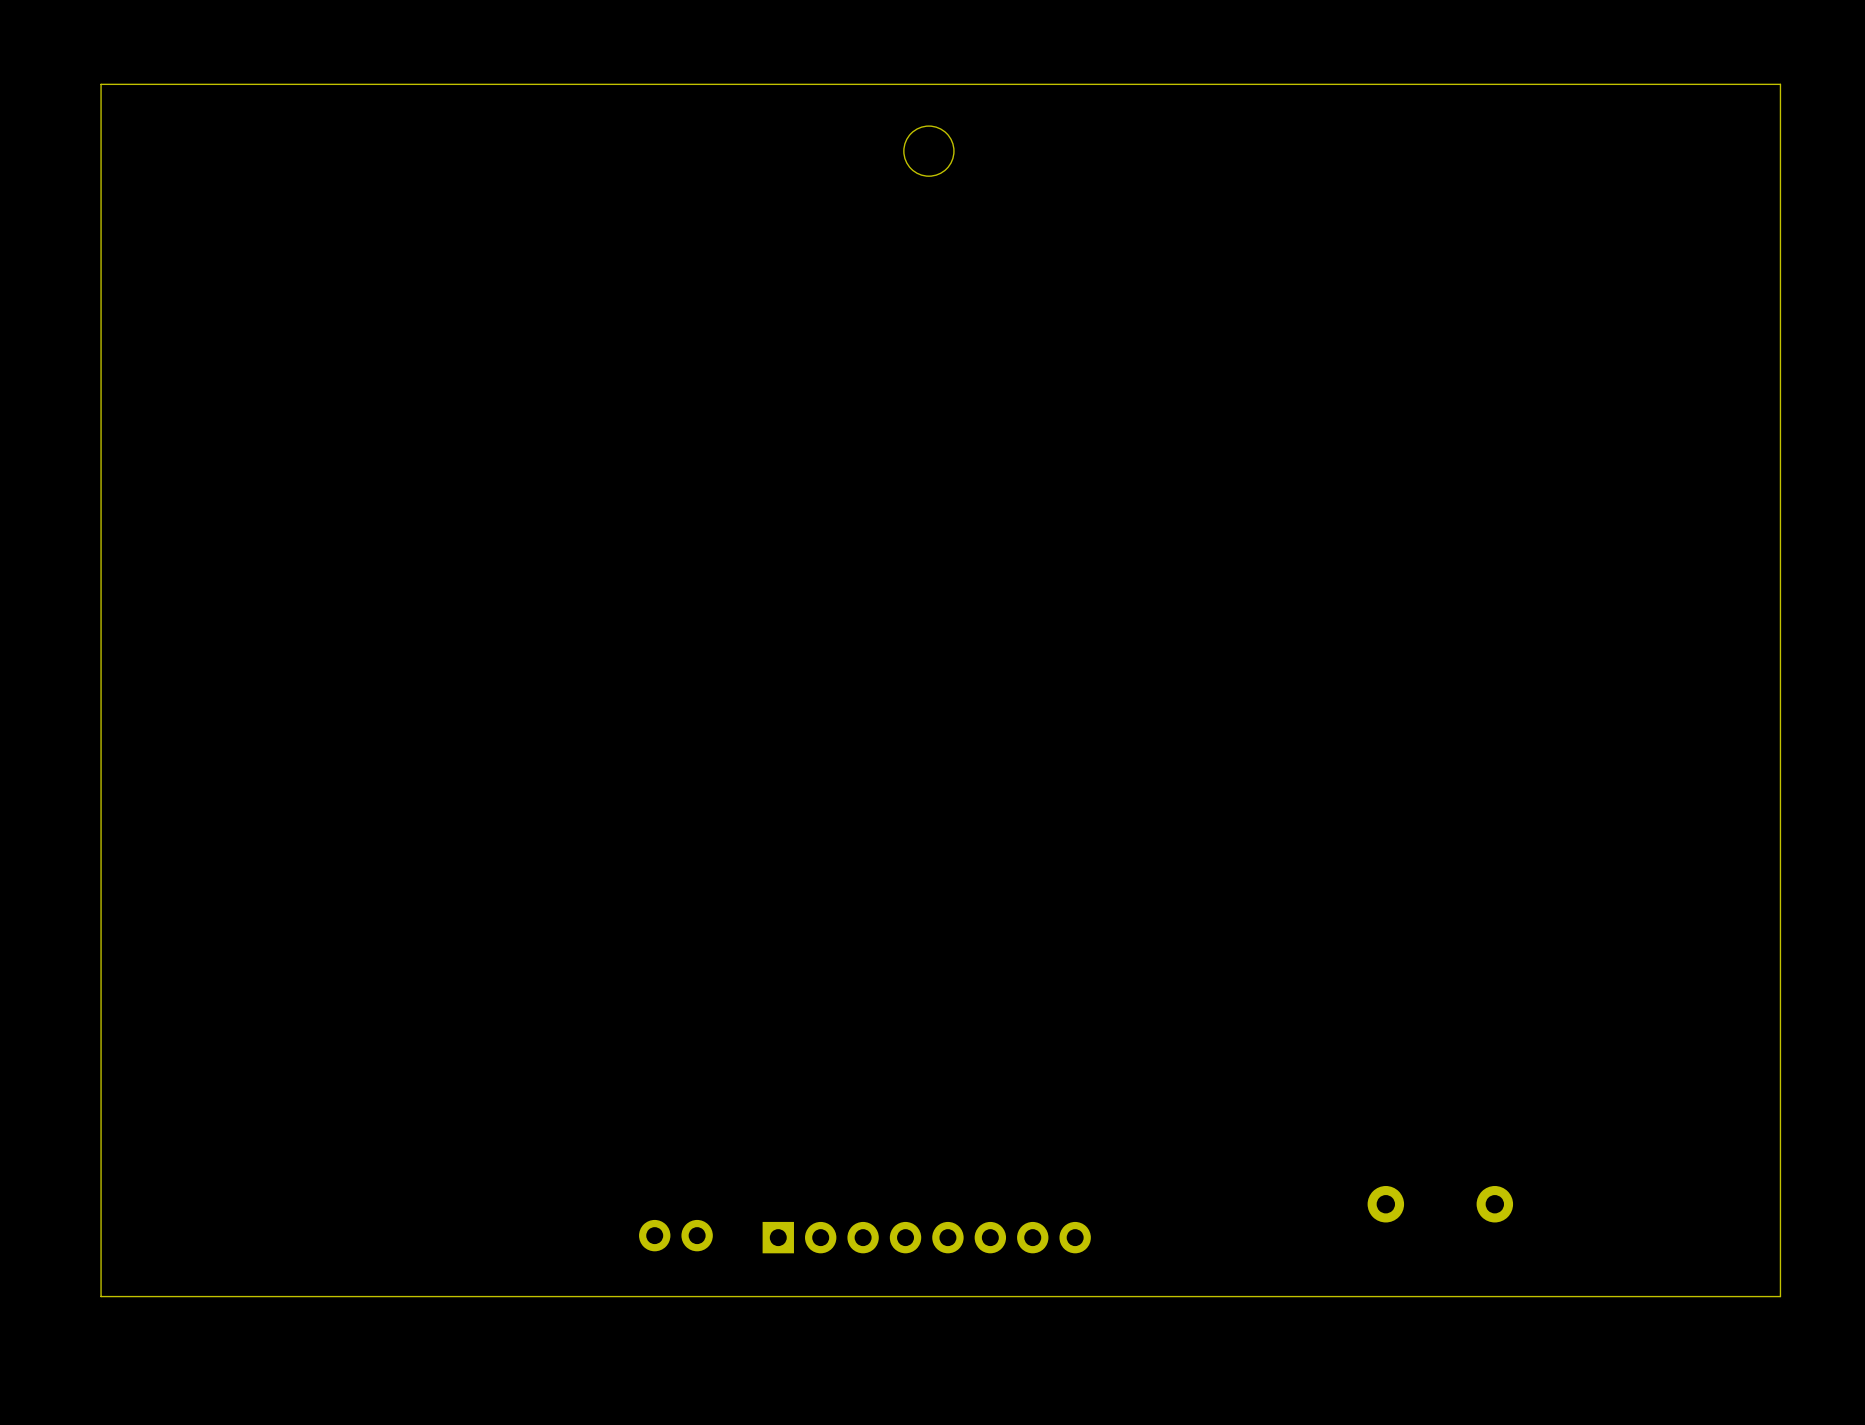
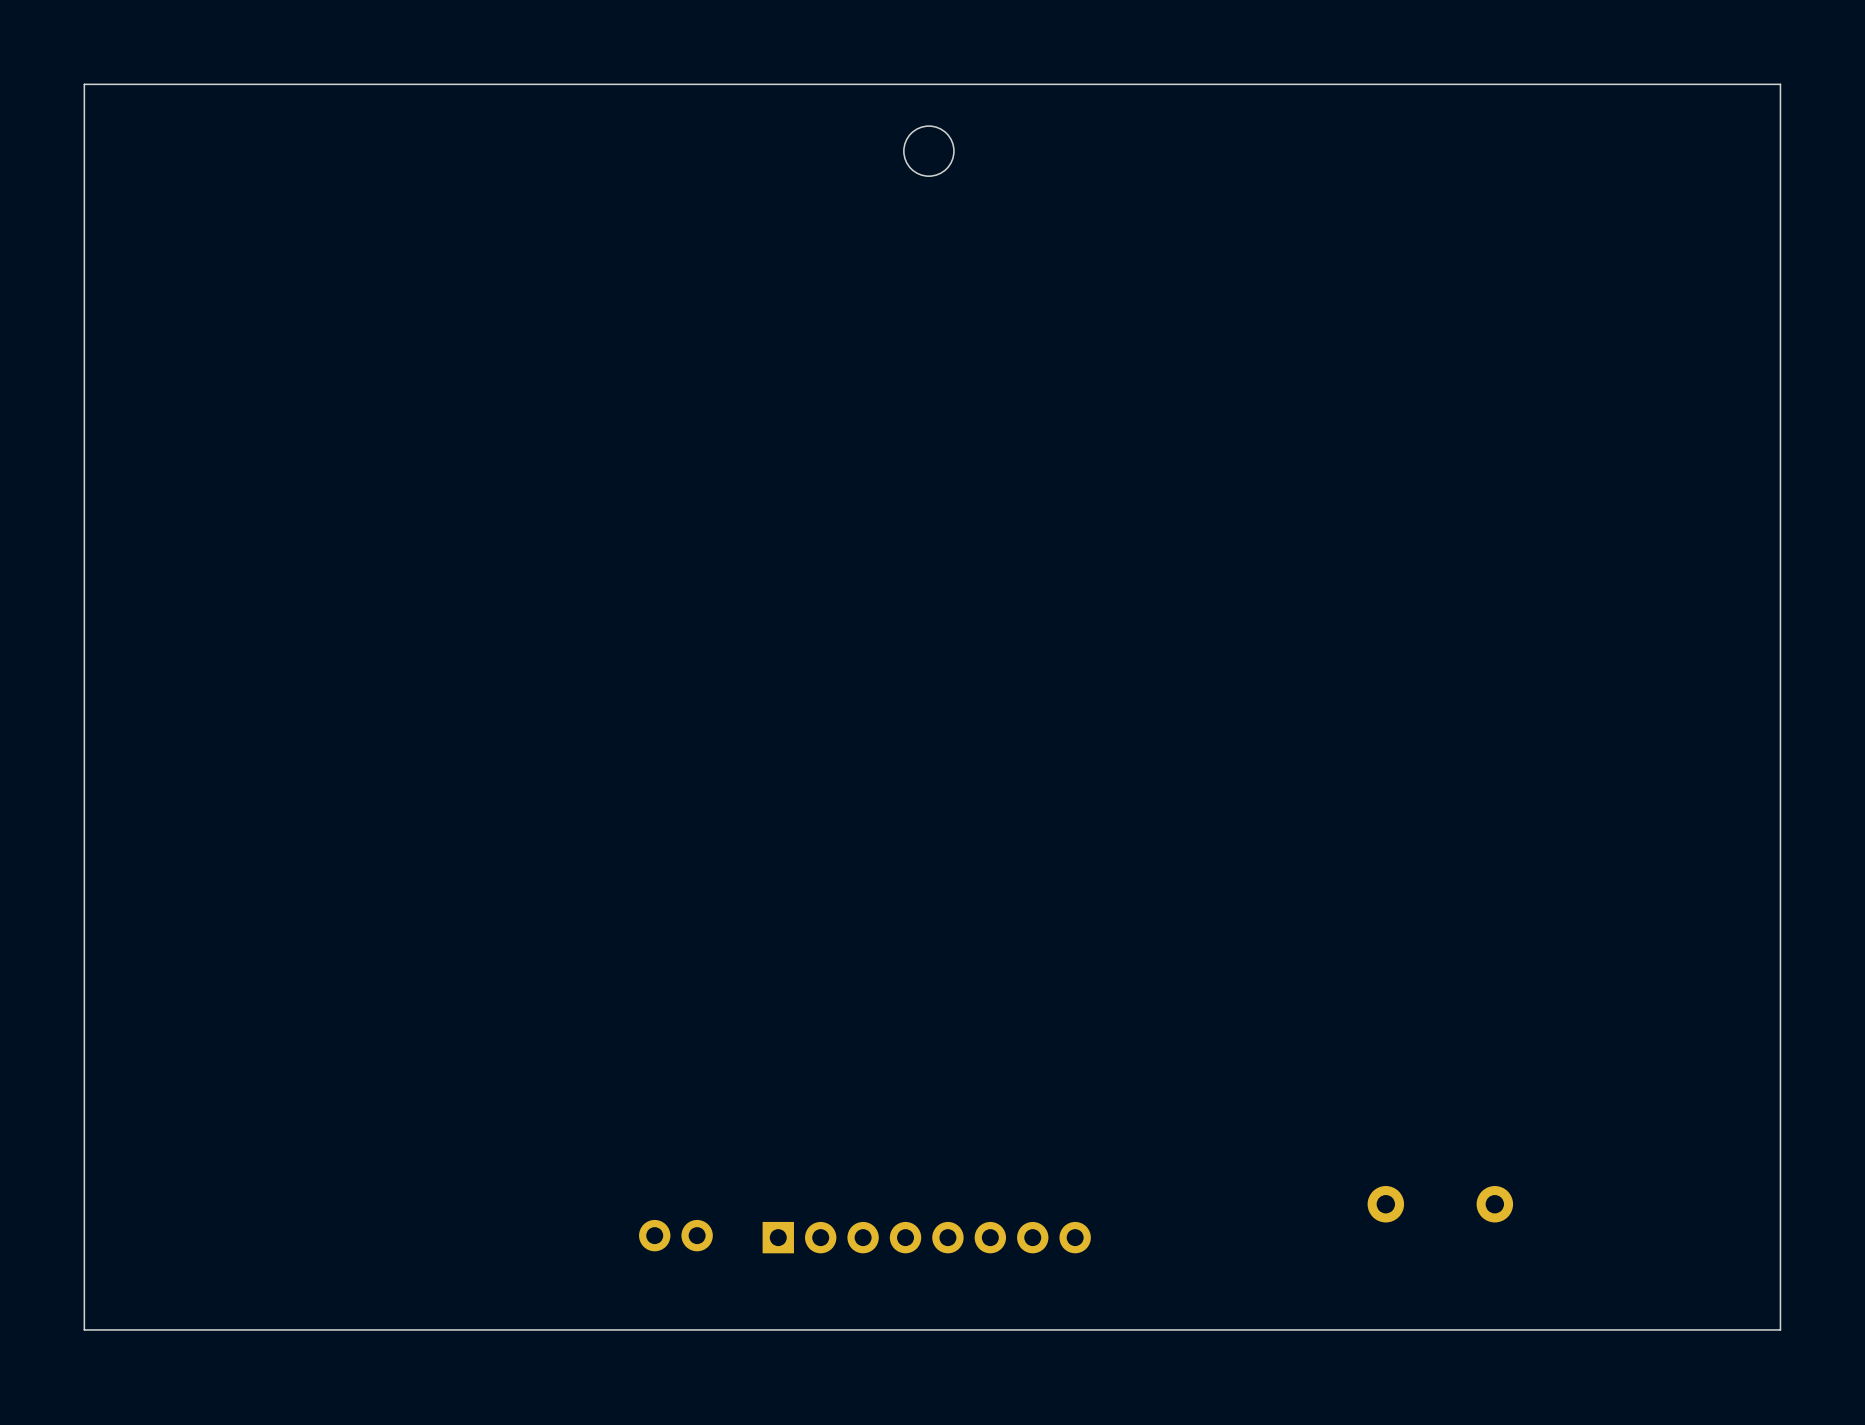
board edge: (101, 84) (101, 1296) (1780, 1296) -> (101, 84) (84, 84) (84, 1329) (1780, 1329) (1780, 1296)

